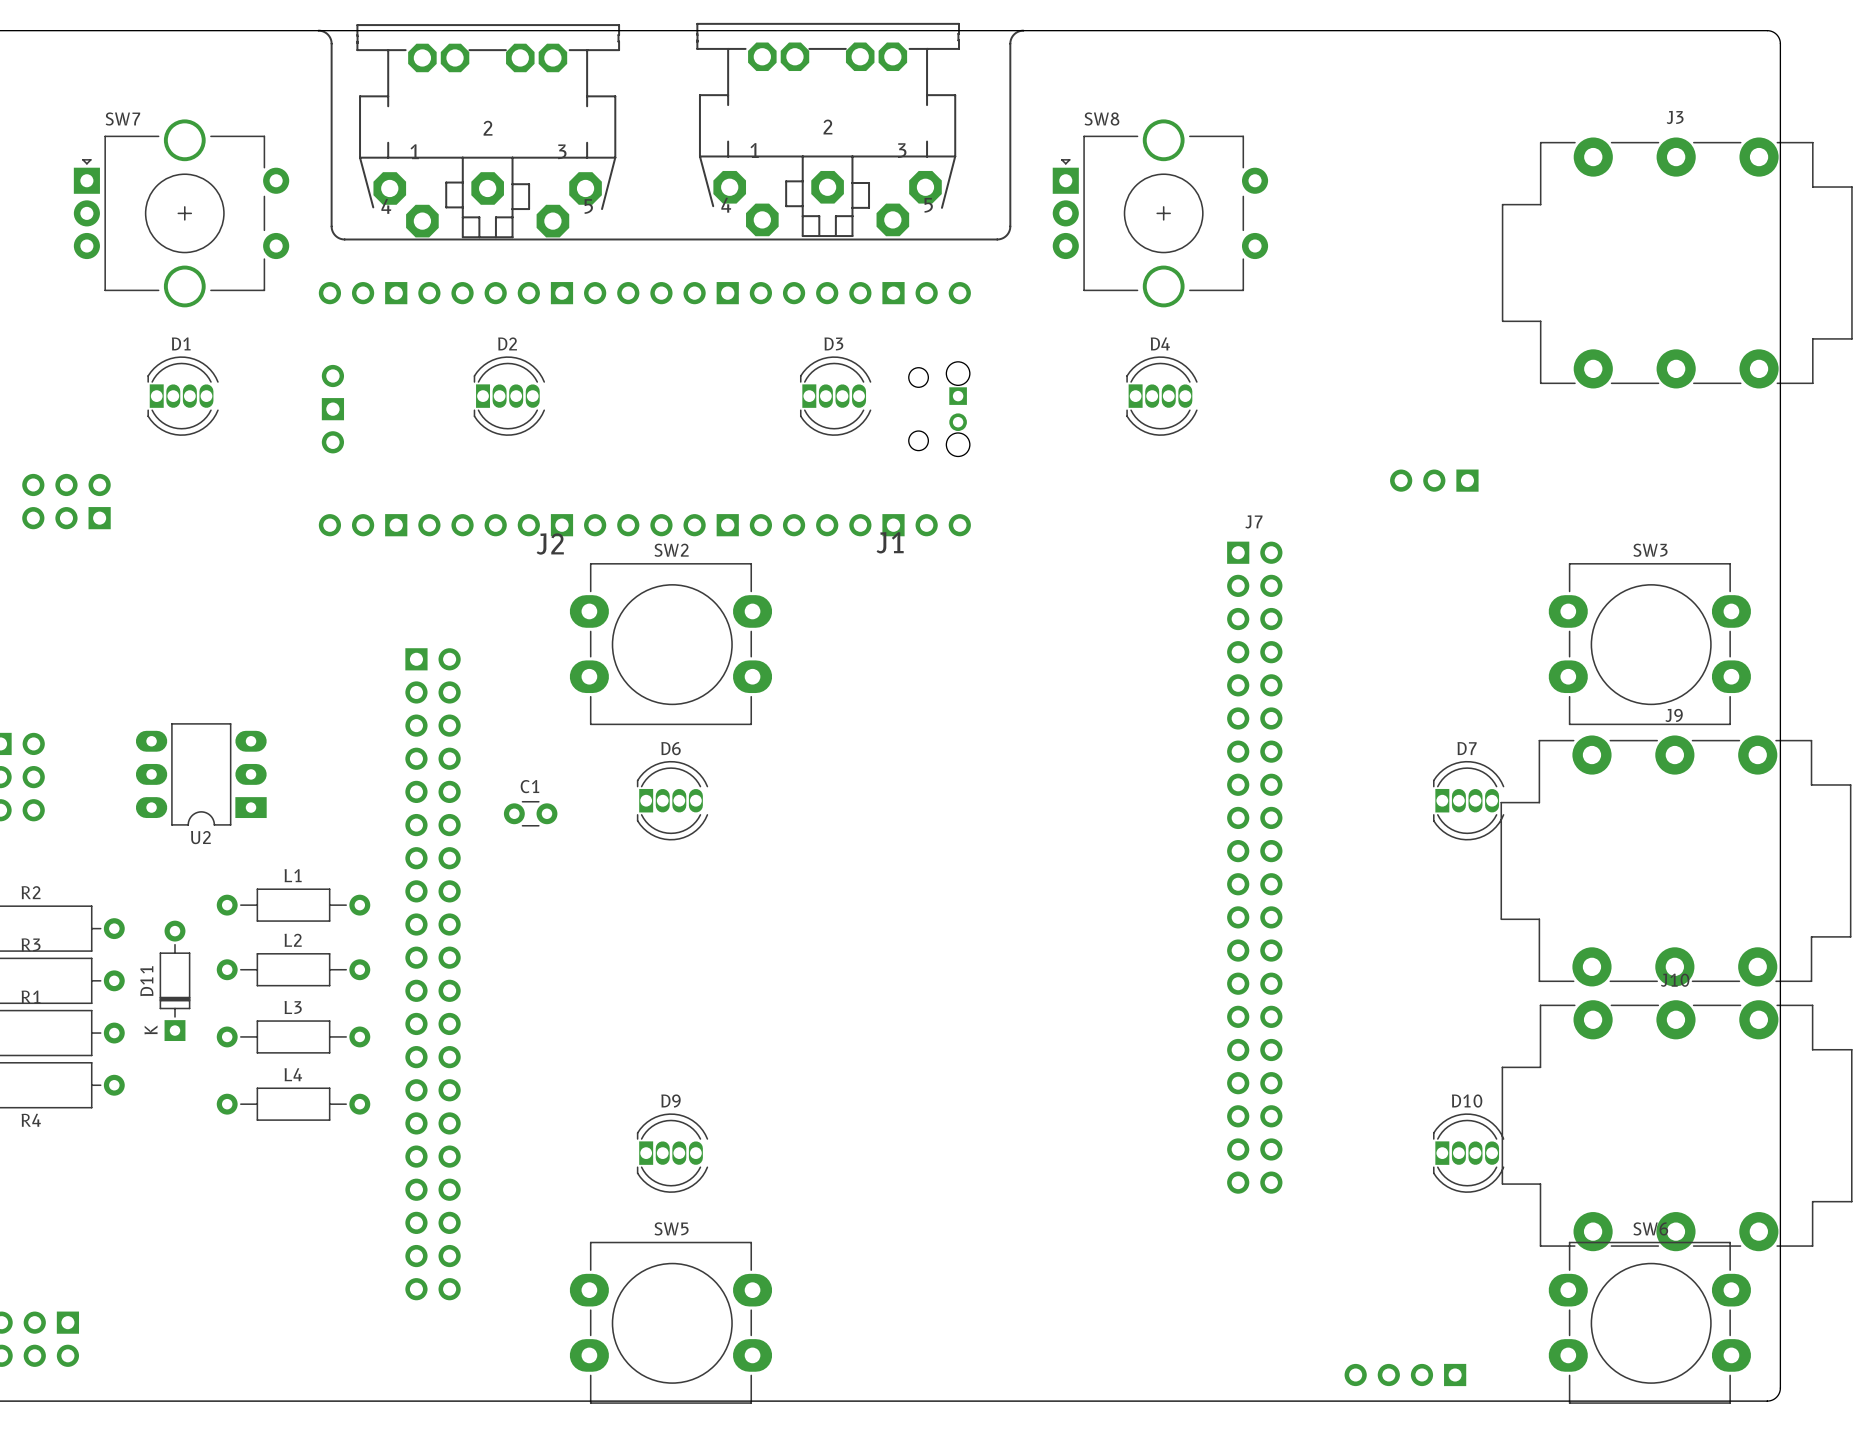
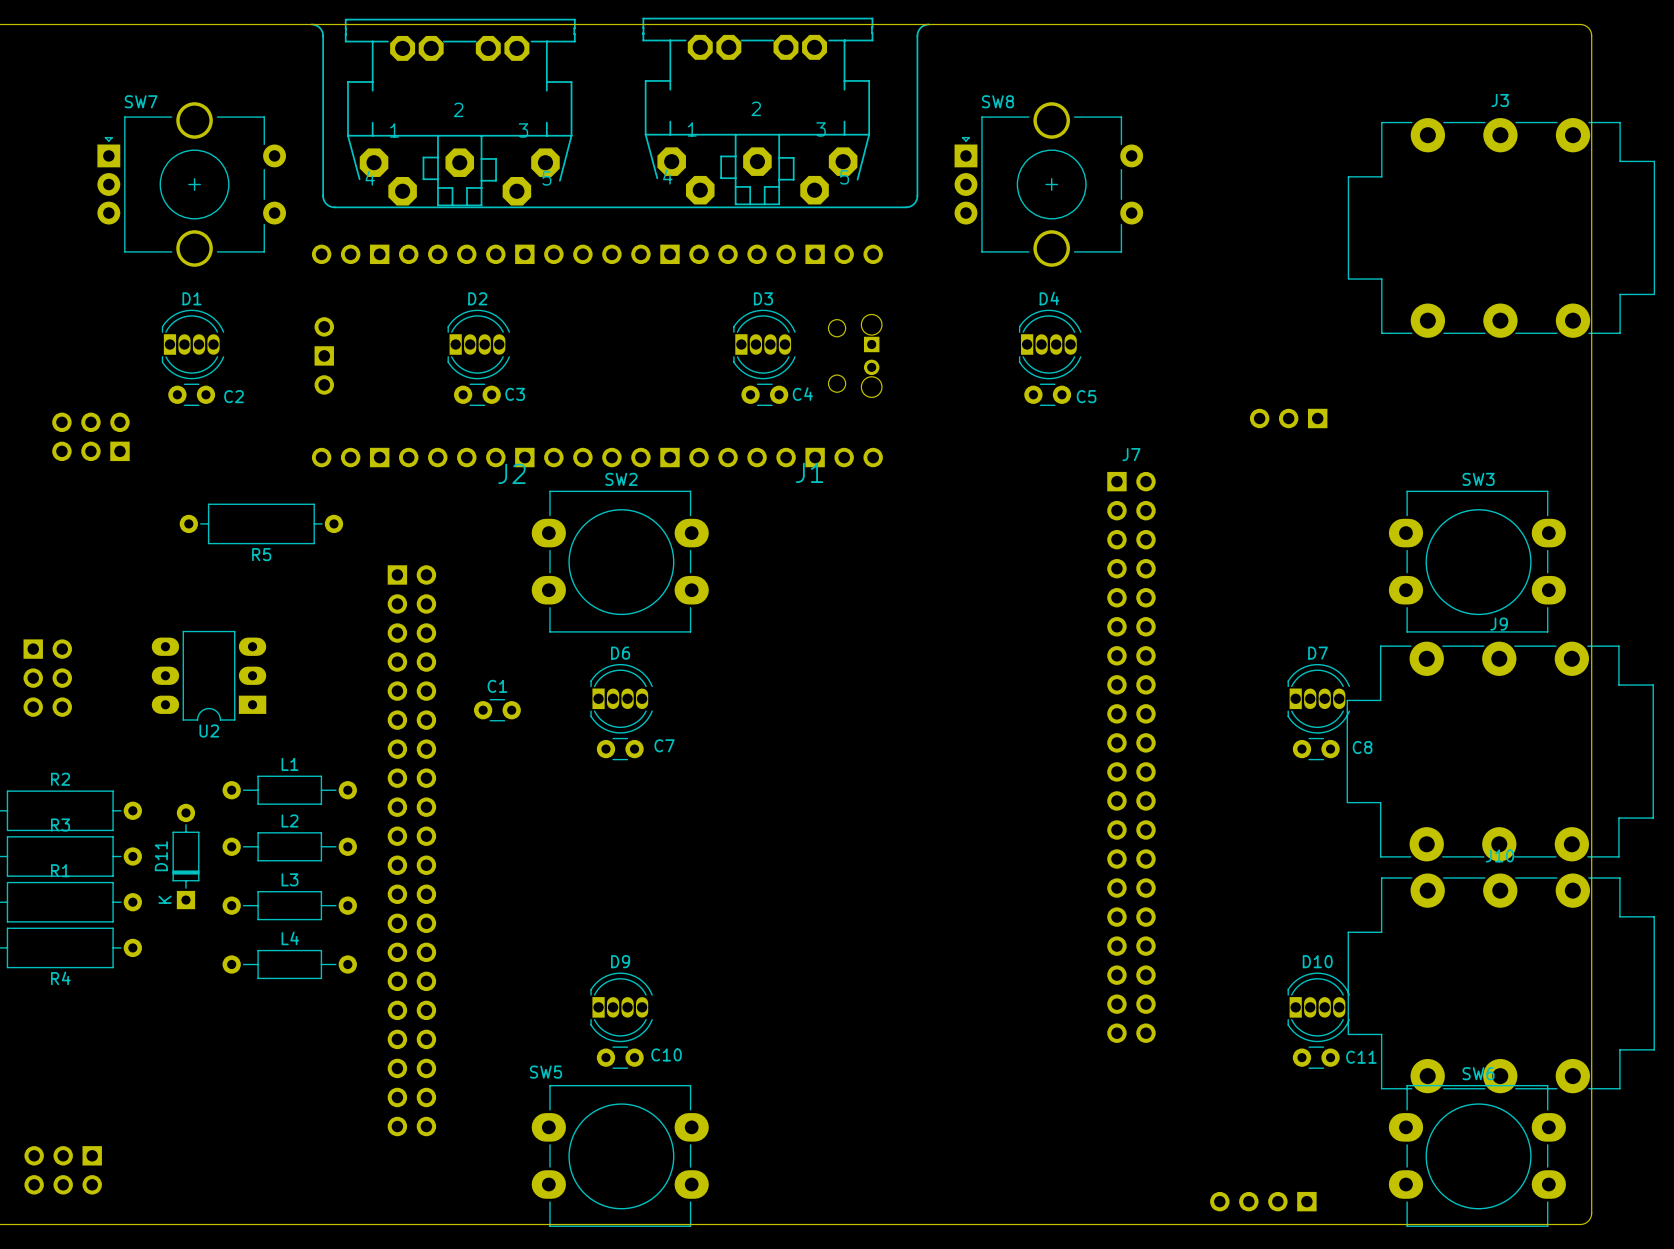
C2: none -> (191, 394)
C3: none -> (477, 394)
C4: none -> (764, 394)
C5: none -> (1047, 394)
R5: none -> (261, 523)
C7: none -> (620, 749)
C8: none -> (1316, 749)
C10: none -> (620, 1057)
C11: none -> (1316, 1057)
SW5 name position: SW5 (671, 1228) -> SW5 (545, 1072)

